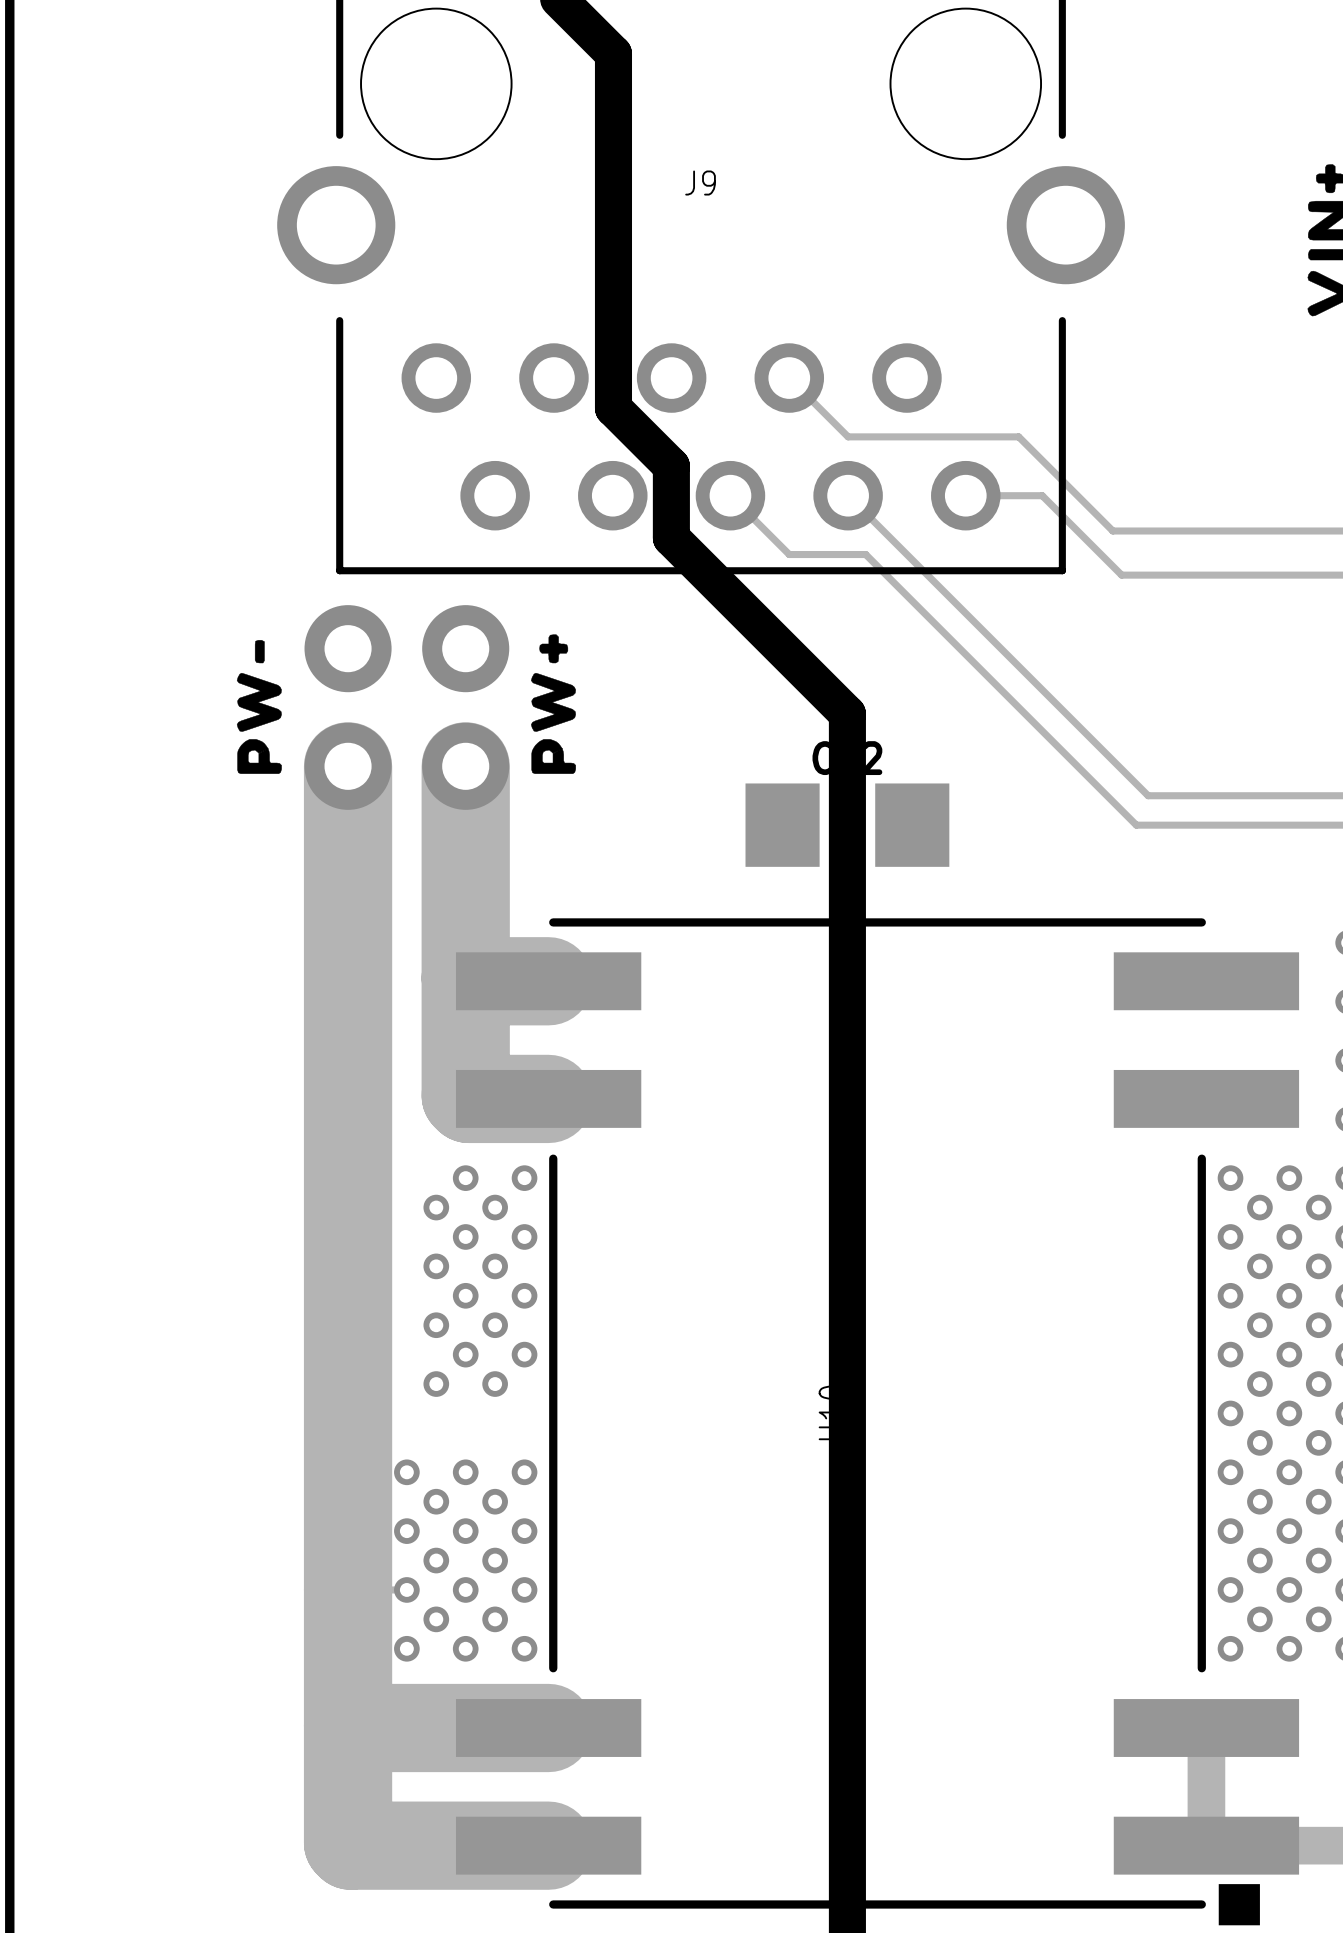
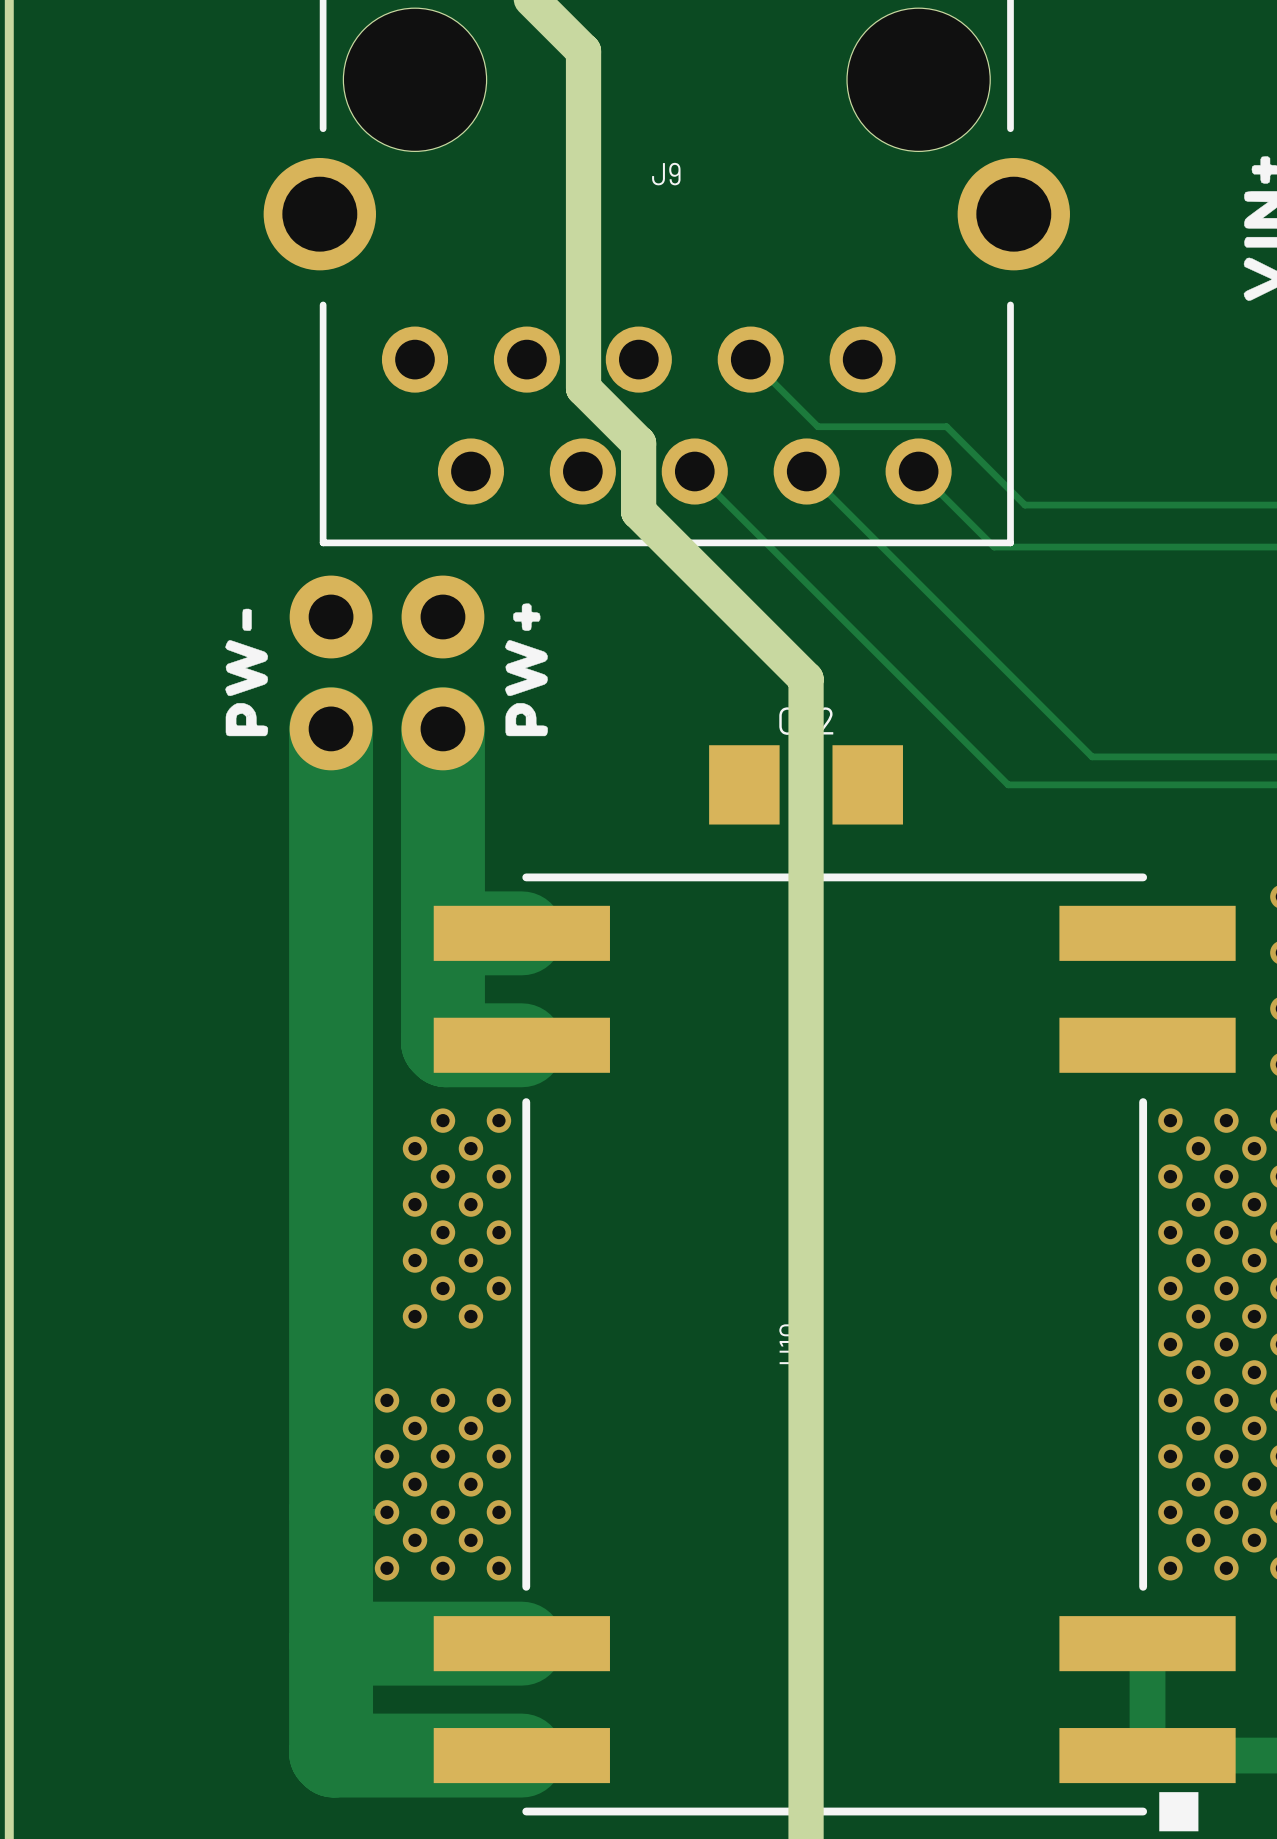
track: (848, 436) (1018, 436) (1112, 531) -> (806, 415) (817, 426) (946, 426) (991, 471)
track: (965, 495) (1042, 495) -> (918, 471) (994, 547) (1066, 547)
track: (1077, 531) (1121, 575) -> (1024, 505) (1058, 505)
track: (789, 554) (865, 554) (1136, 825) -> (750, 527) (1008, 784) (1080, 784)

